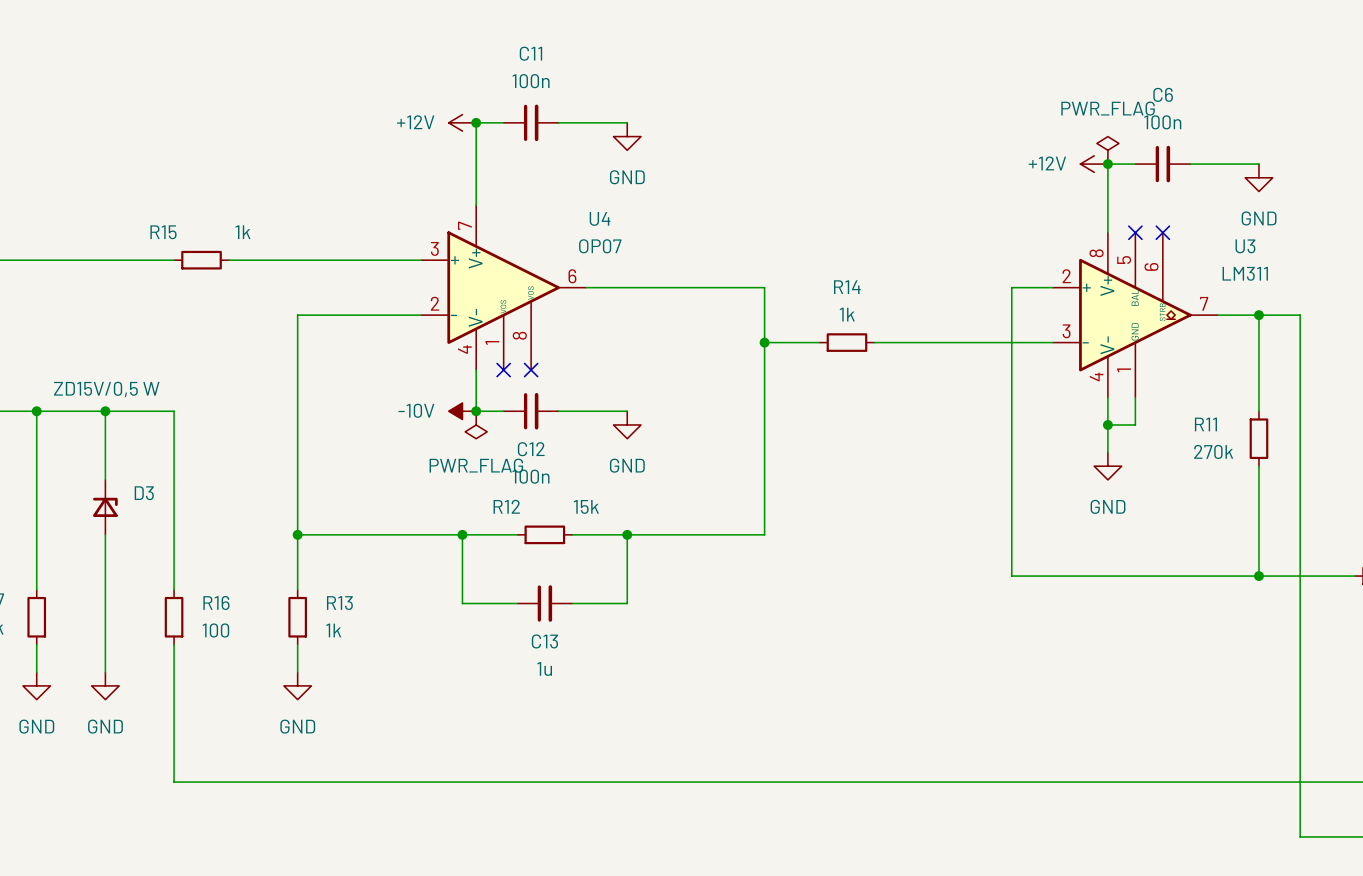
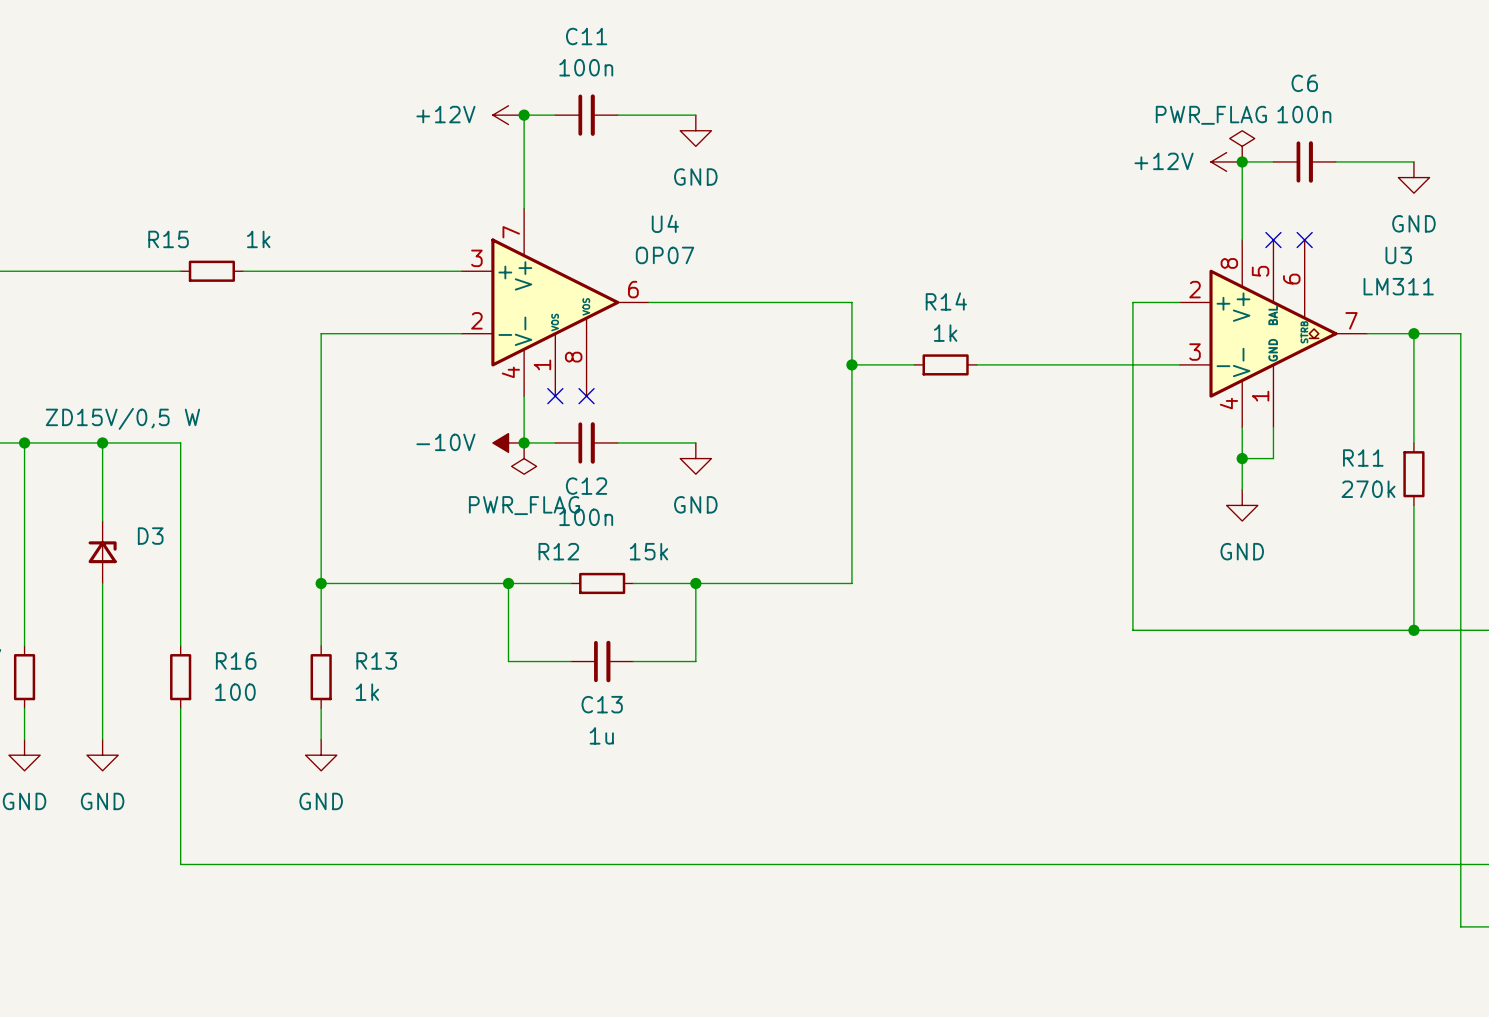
power symbol text position: PWR_FLAG (1108, 108) -> PWR_FLAG (1211, 115)

